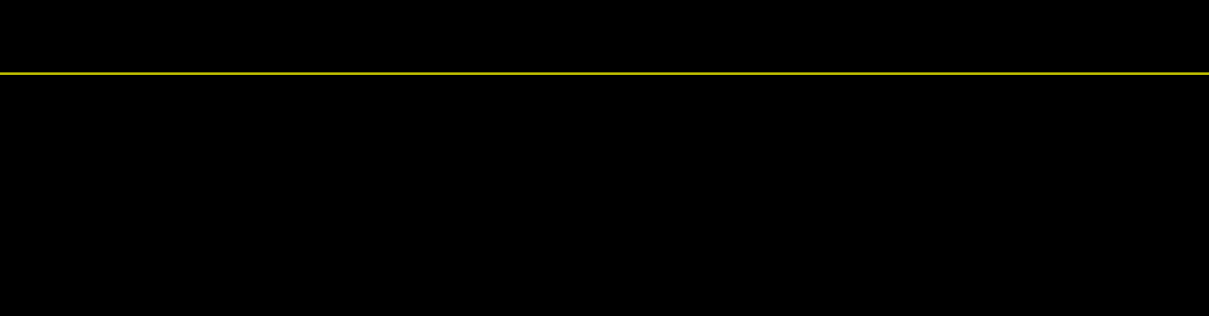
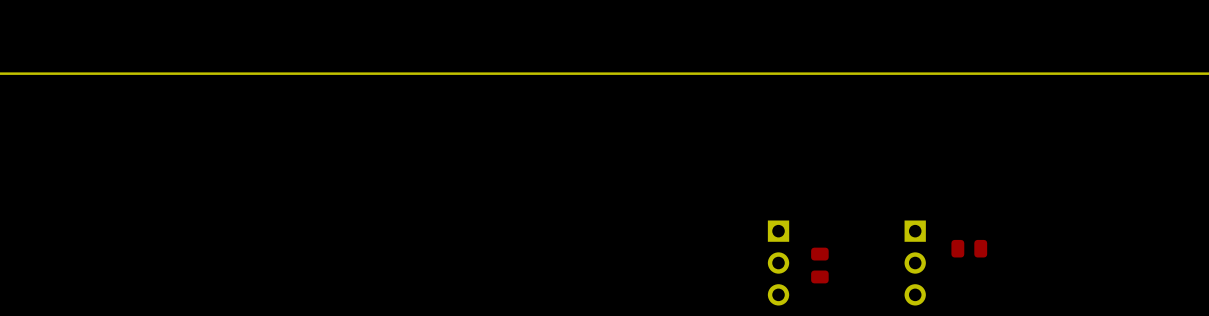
part: none -> (969, 248)
part: none -> (778, 263)
part: none -> (915, 263)
part: none -> (819, 265)

